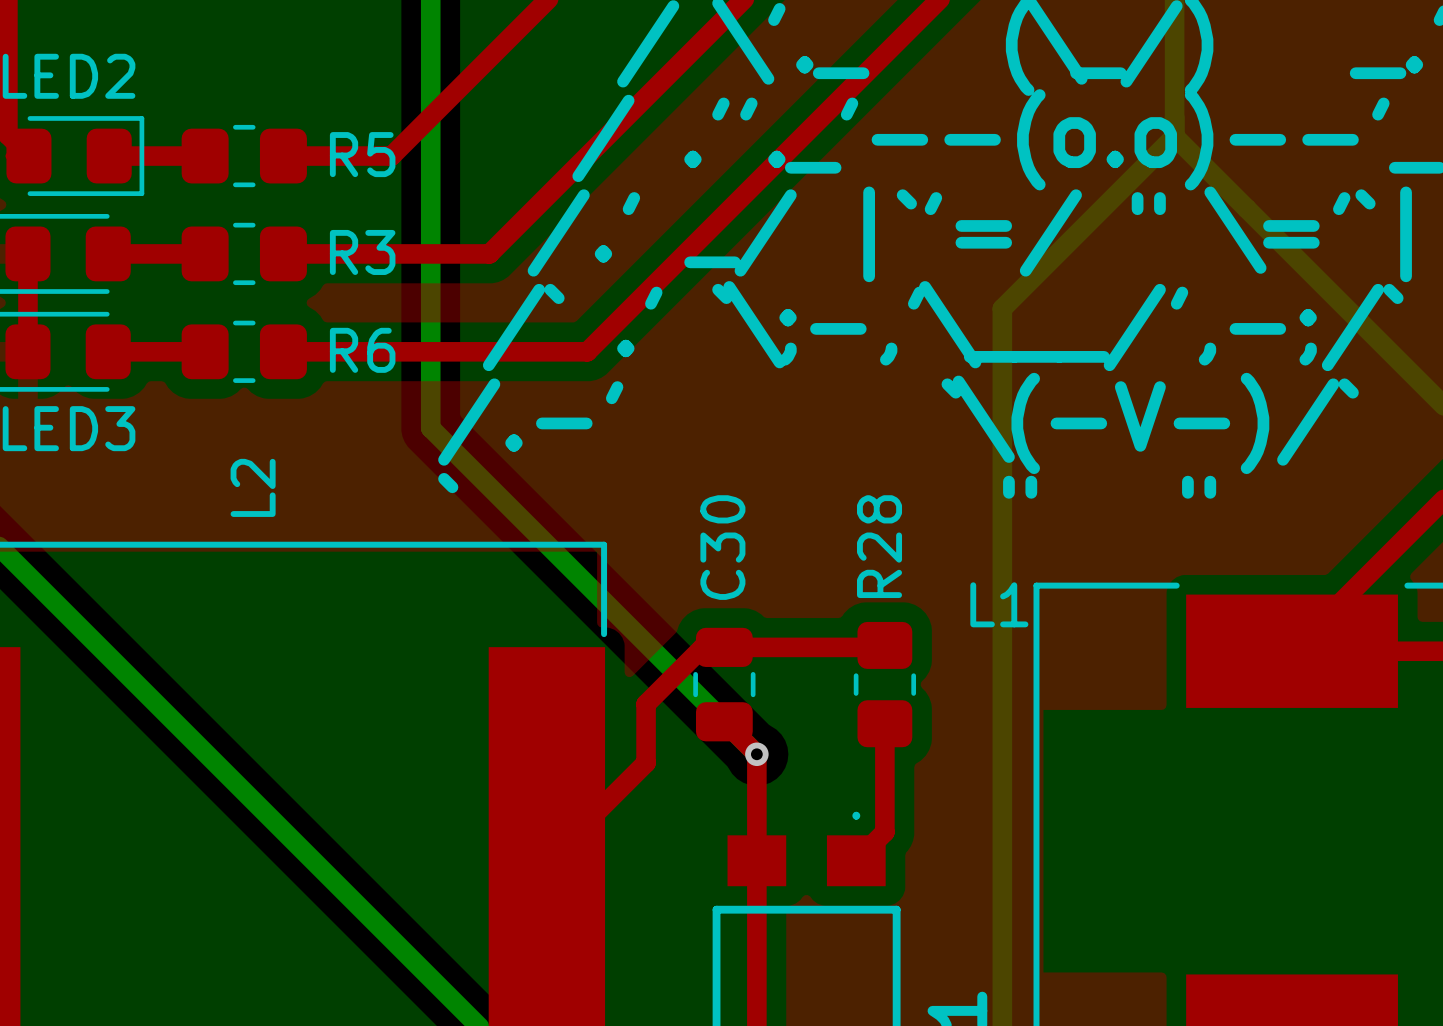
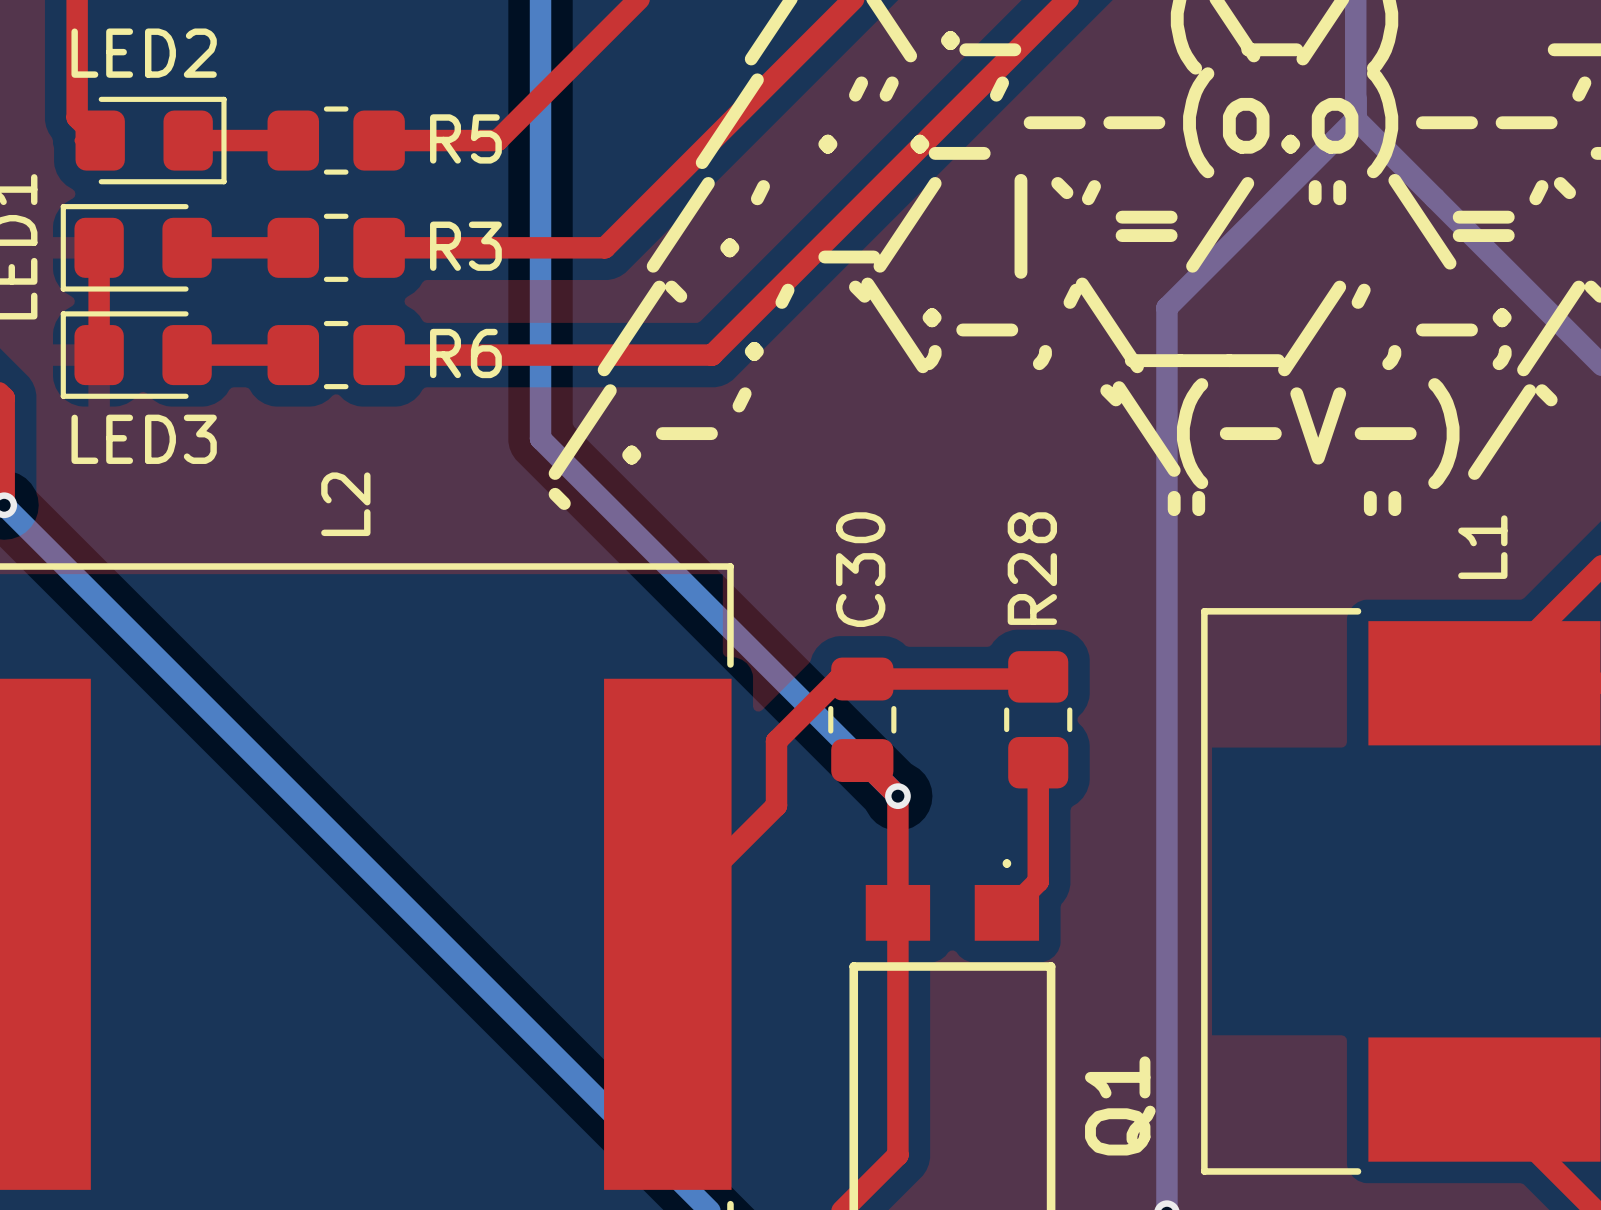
L1 name rotation: 0° (999, 604) -> 90° counterclockwise (1482, 547)
L1 name position: L1 (999, 604) -> L1 (1482, 547)

